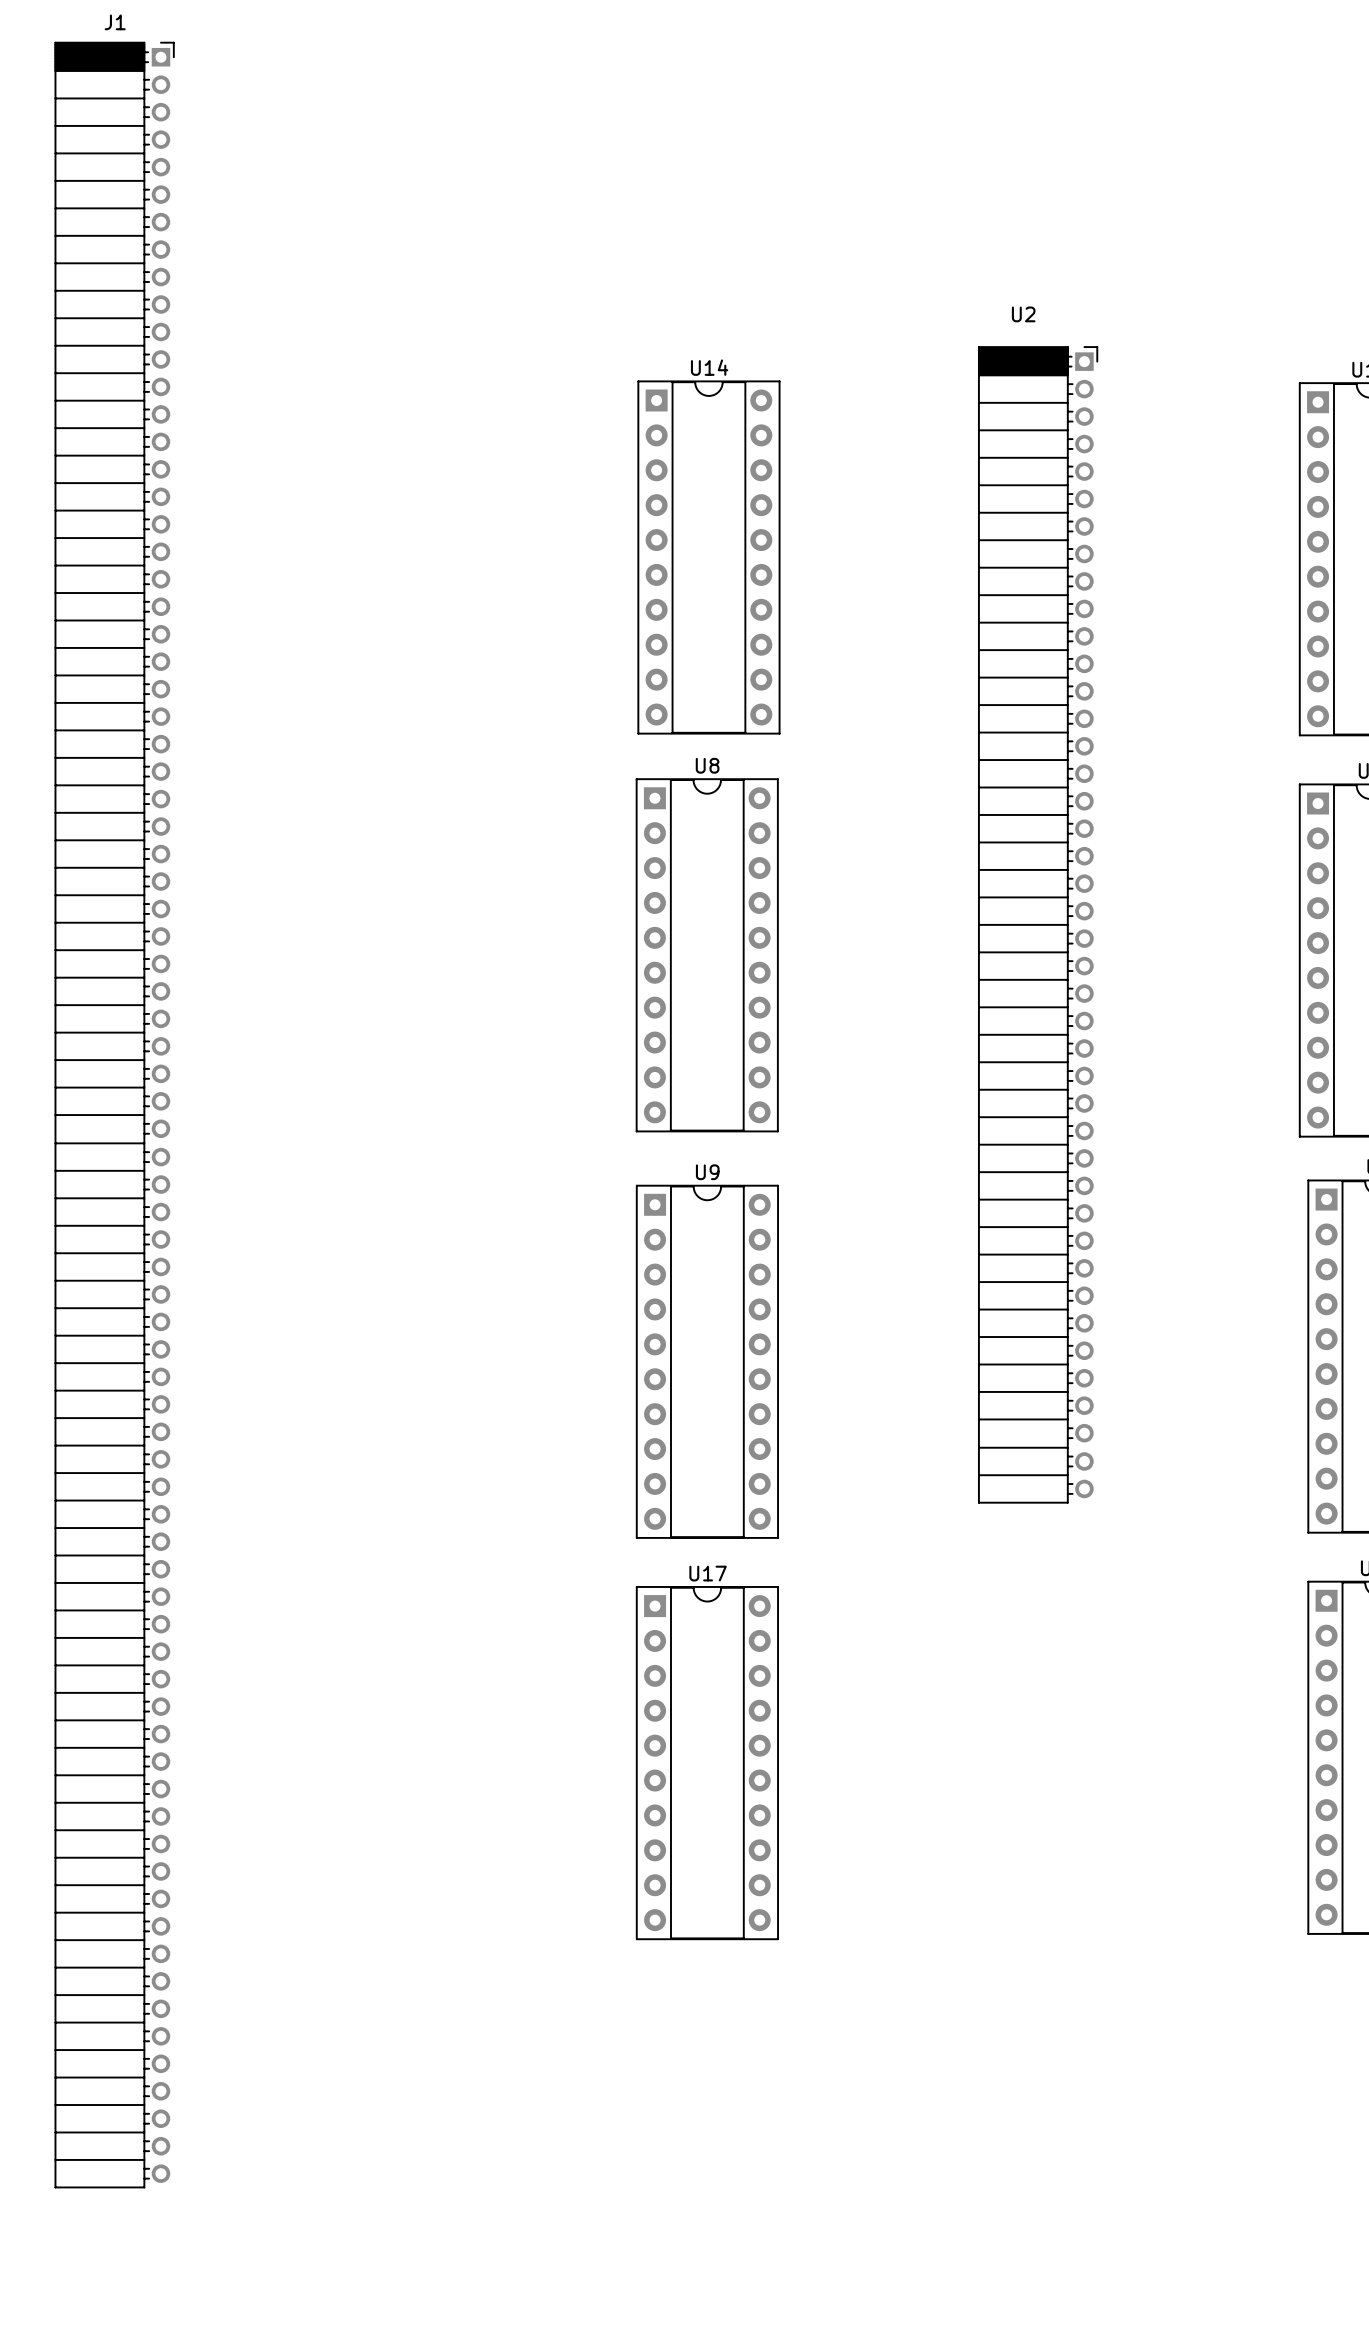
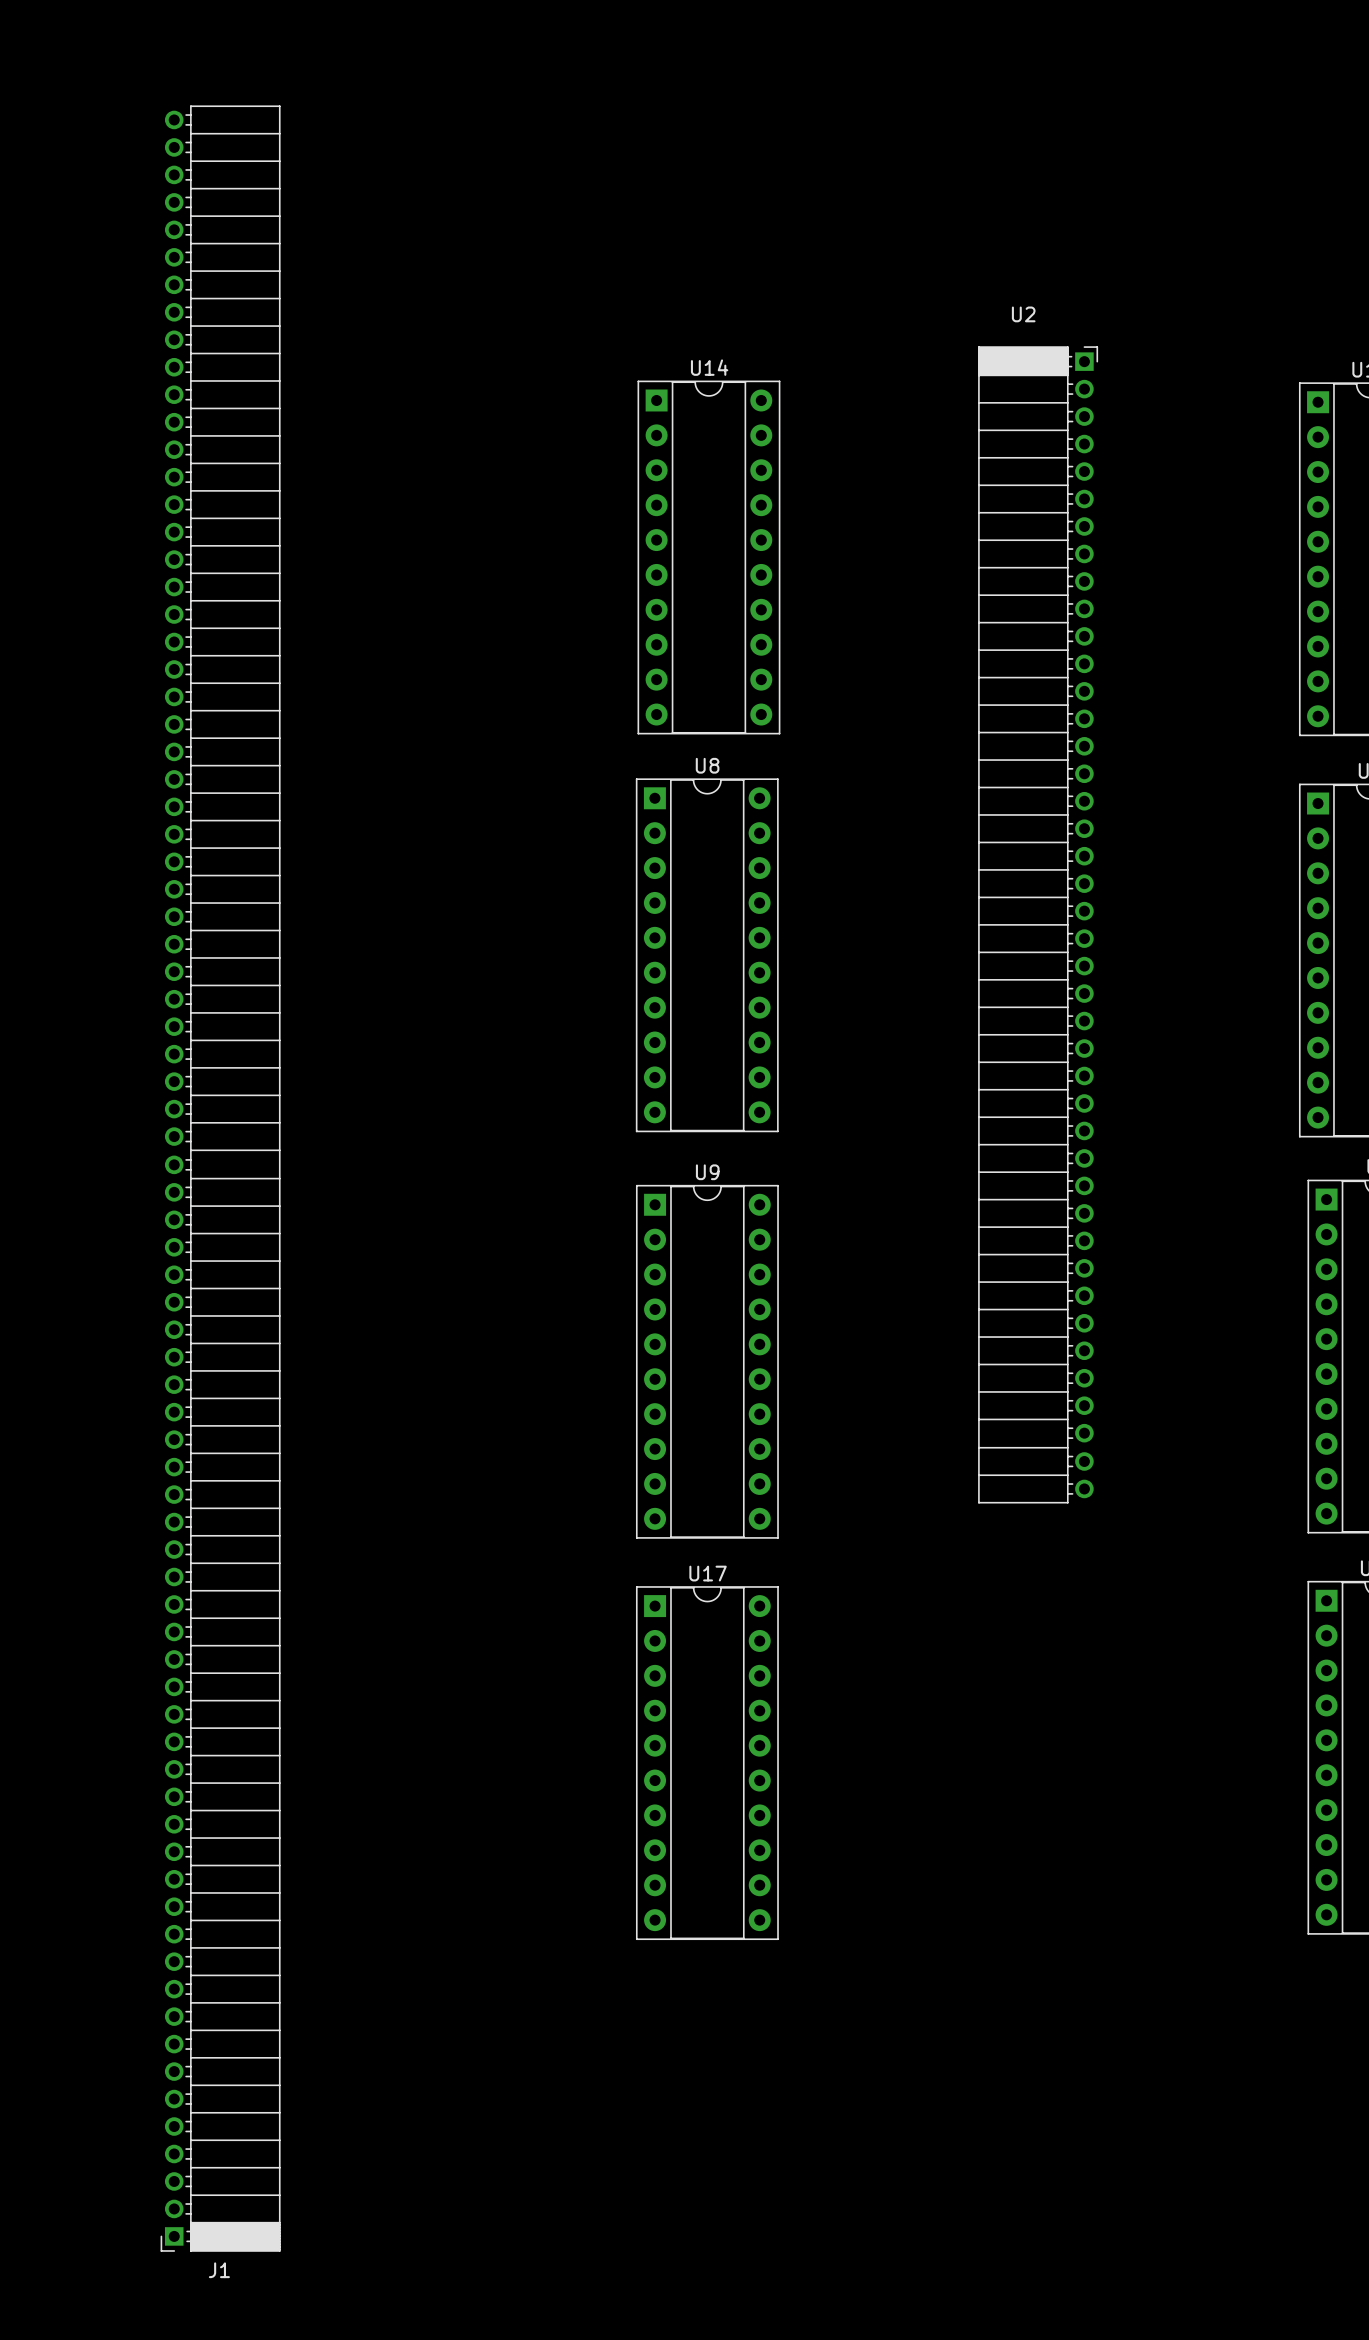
J1 rotation: 0° (114, 1115) -> 180° (220, 1178)

